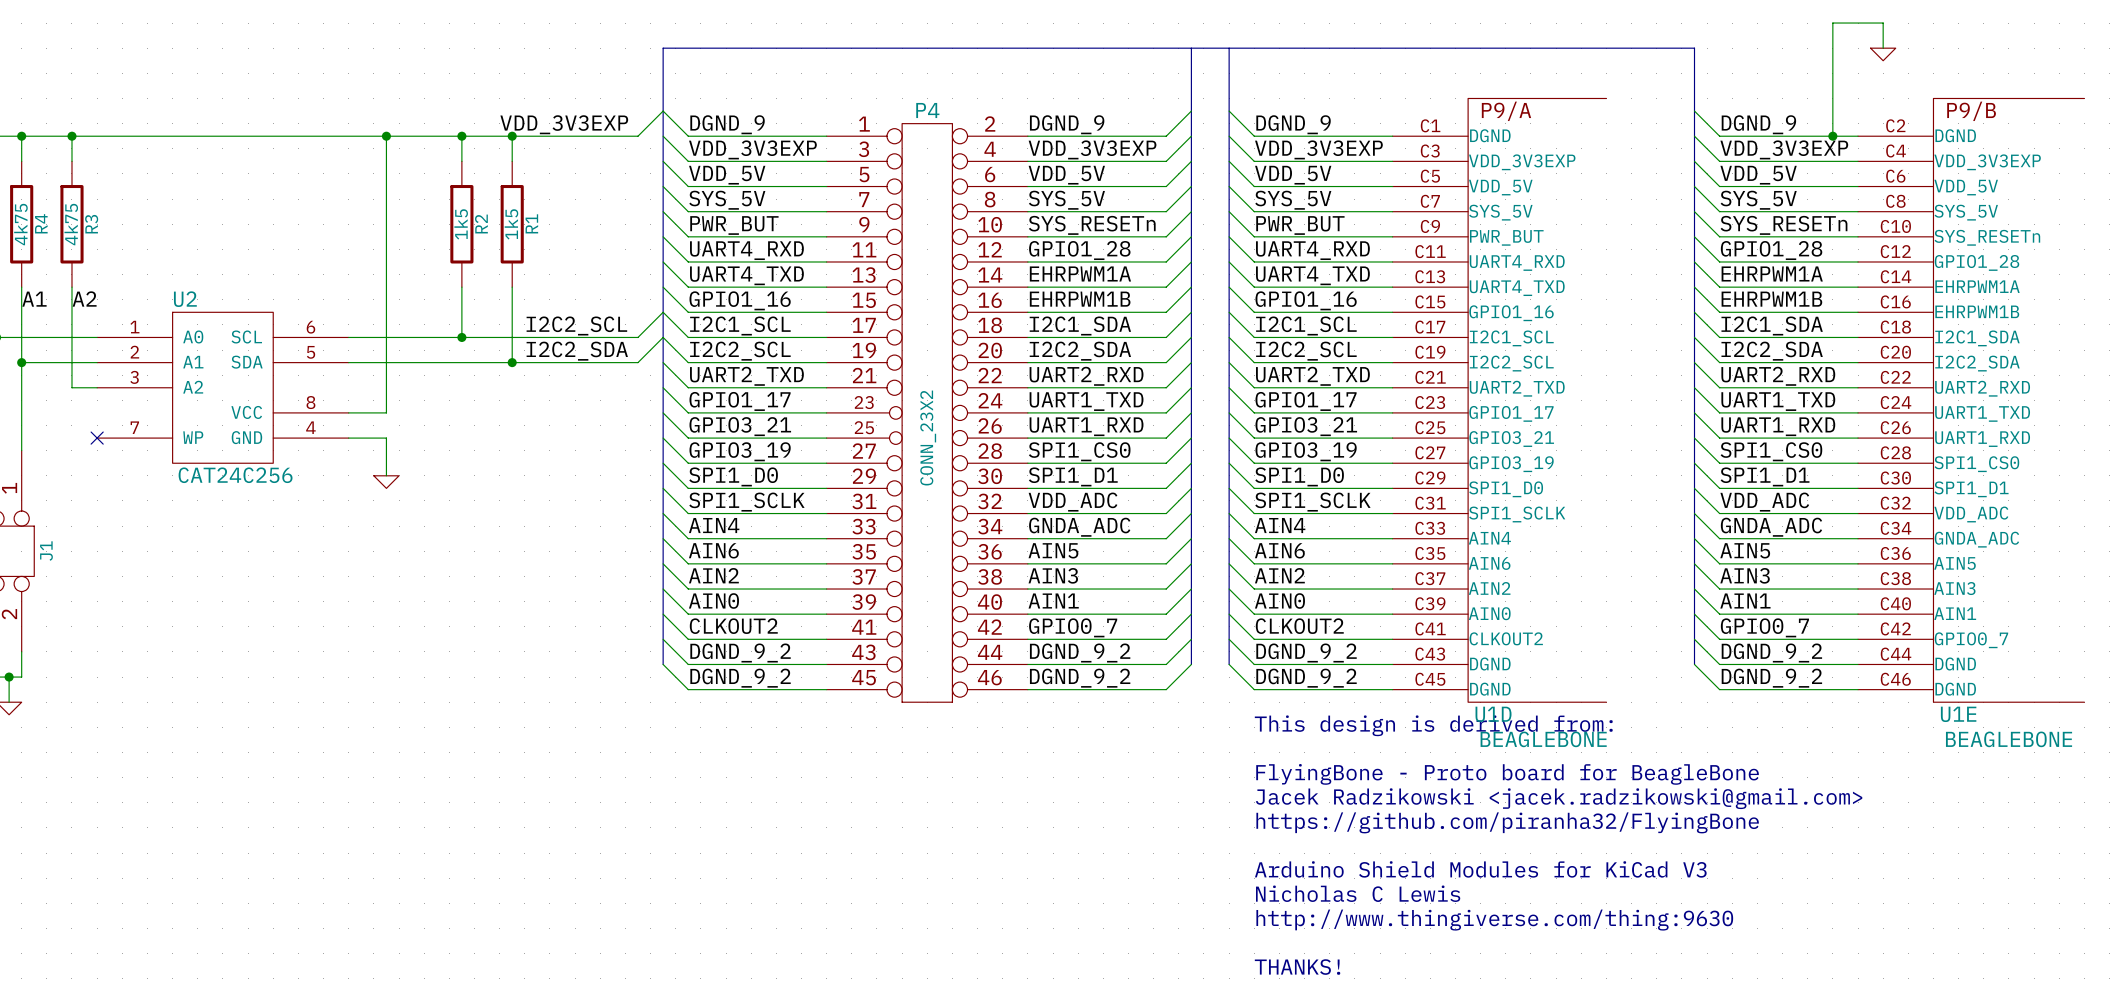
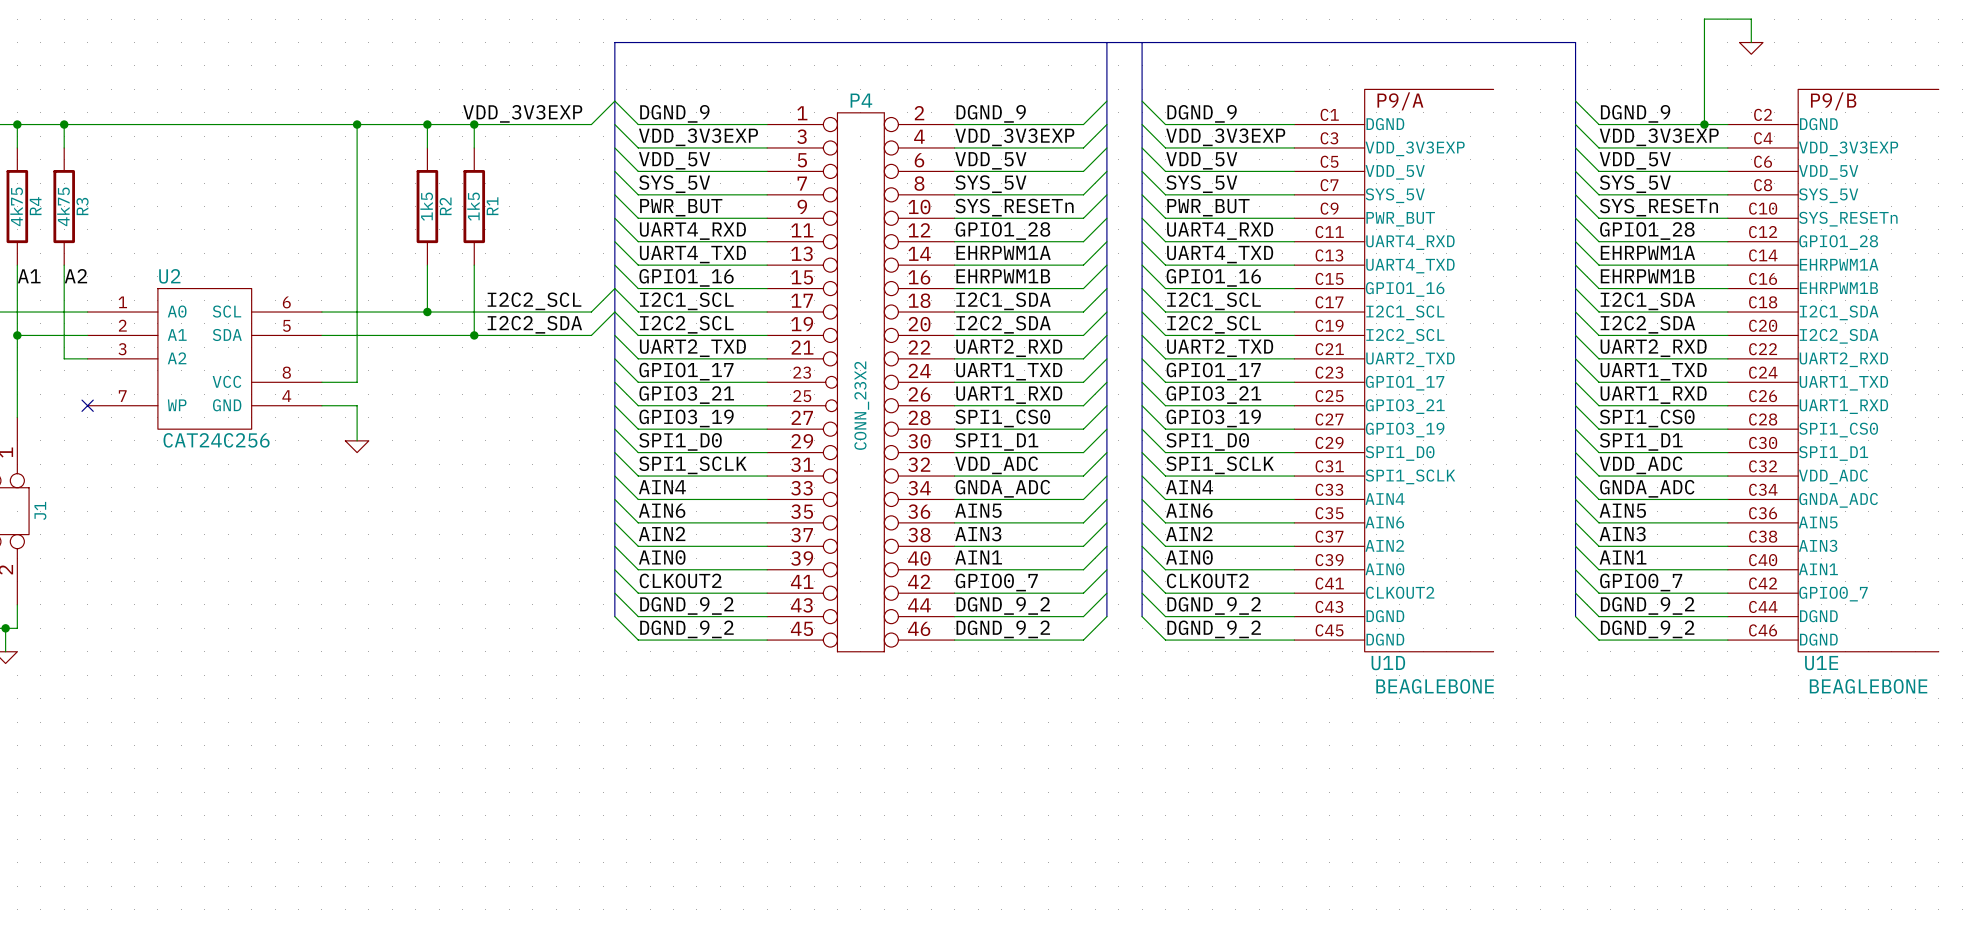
text: This design is derived from: (1433, 725) -> none
text: FlyingBone - Proto board for BeagleBone (1507, 774) -> none
text: Jacek Radzikowski <jacek.radzikowski@gmail.com> (1559, 798) -> none
text: https://github.com/piranha32/FlyingBone (1507, 822) -> none
text: Arduino Shield Modules for KiCad V3 (1480, 869) -> none
text: Nicholas C Lewis (1358, 893) -> none
text: http://www.thingiverse.com/thing:9630 (1494, 920) -> none
text: THANKS! (1297, 967) -> none

